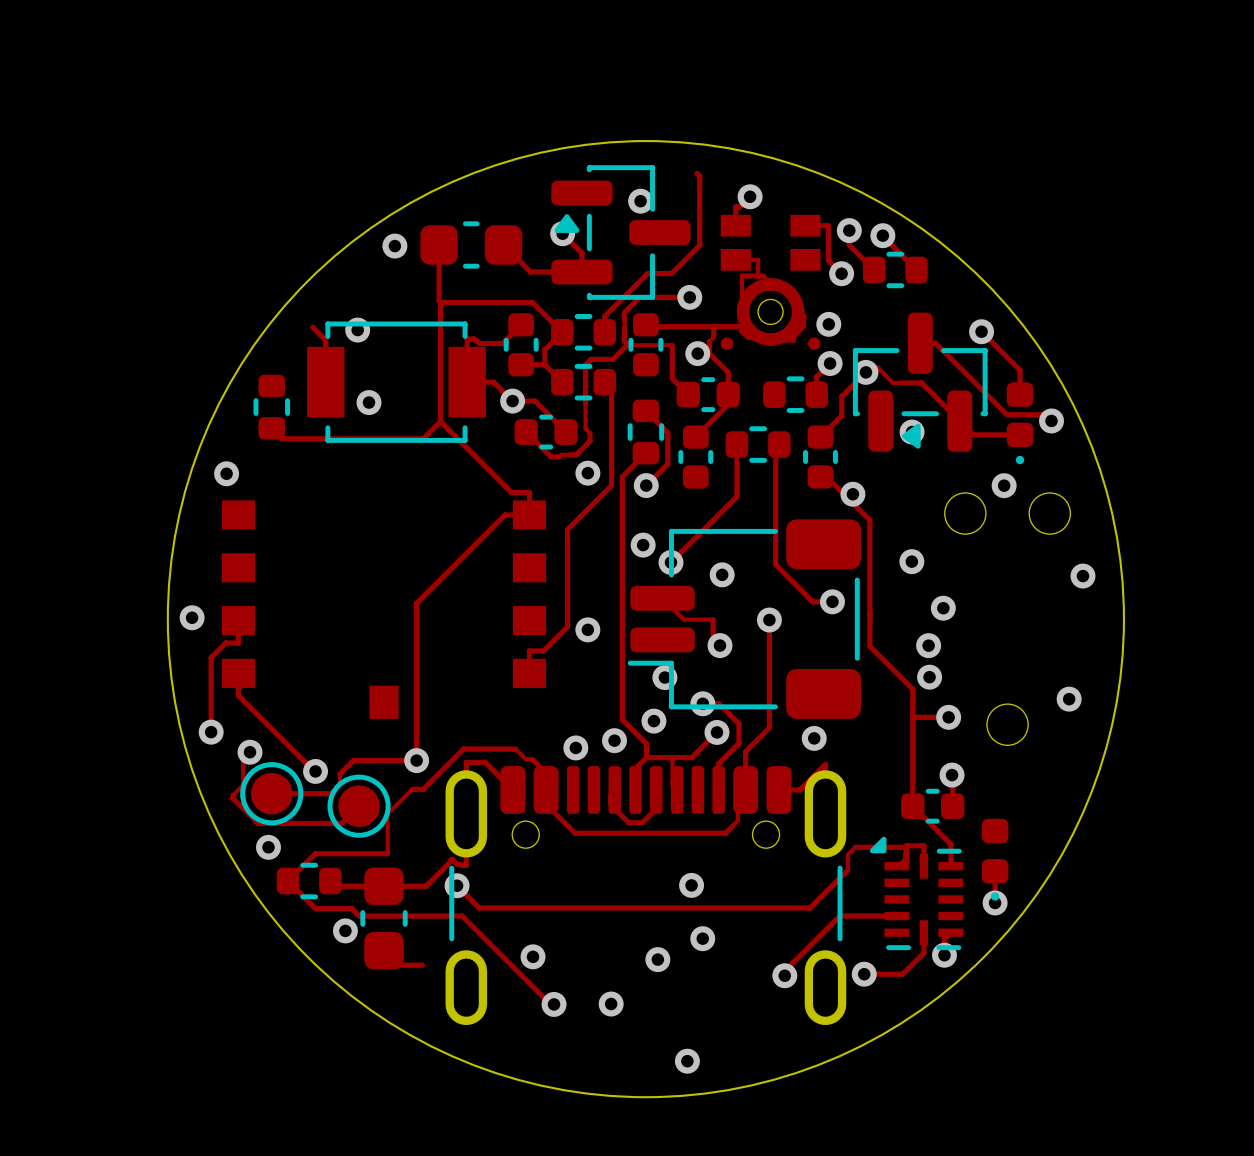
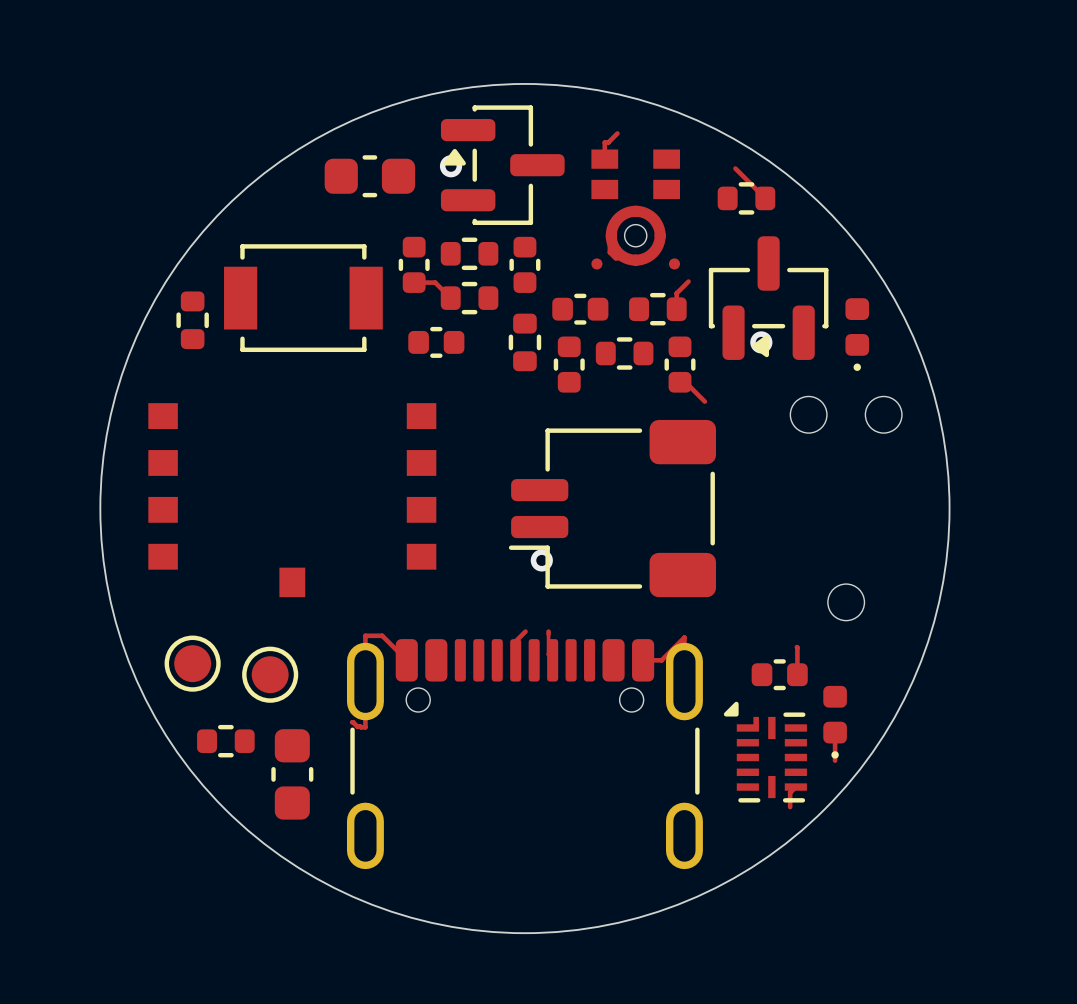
track: (697, 173) (699, 176) (699, 245) (671, 273) (647, 273) (604, 316) (604, 332) -> none
via: (750, 196) -> none
via: (640, 201) -> none
track: (805, 225) (828, 225) (828, 260) (841, 273) -> none
track: (849, 230) (849, 245) (874, 269) -> none
via: (849, 230) -> none
track: (562, 233) (581, 253) (581, 272) (530, 272) (503, 244) -> none
via: (882, 235) -> none
track: (439, 244) (440, 302) -> none
via: (394, 246) -> none
track: (735, 259) (758, 259) (758, 275) -> none
via: (841, 273) -> none
track: (770, 284) (763, 275) (742, 275) (742, 314) -> none
track: (689, 297) (639, 297) (624, 312) (624, 341) (627, 344) -> none
via: (689, 297) -> none
track: (440, 302) (440, 421) -> none
track: (440, 302) (532, 302) (562, 332) (544, 349) (544, 364) -> none
track: (798, 311) (803, 316) (803, 326) (793, 337) (793, 340) (770, 340) -> none
track: (521, 324) (502, 343) (479, 343) (473, 338) (467, 338) (467, 382) (493, 382) (512, 401) (535, 401) (566, 432) -> none
track: (645, 324) (647, 326) (741, 326) -> none
via: (828, 324) -> none
track: (713, 326) (713, 337) (709, 341) (709, 353) -> none
track: (312, 327) (325, 338) (325, 382) -> none
via: (357, 330) -> none
track: (981, 331) (1020, 370) (1020, 394) -> none
via: (981, 331) -> none
track: (920, 343) (935, 343) (1006, 414) (1045, 414) (1051, 420) -> none
track: (627, 344) (612, 359) (591, 359) (585, 365) (585, 428) (589, 433) (589, 441) (576, 454) (551, 456) (526, 432) -> none
track: (627, 344) (672, 345) (672, 378) (688, 394) -> none
via: (697, 353) -> none
track: (709, 353) (728, 372) (728, 404) (695, 437) -> none
via: (830, 363) -> none
via: (865, 372) -> none
track: (604, 382) (611, 389) (611, 485) (567, 529) (567, 626) (543, 650) (529, 650) (529, 673) -> none
via: (512, 401) -> none
via: (368, 402) -> none
track: (645, 410) (667, 432) (667, 464) (646, 485) -> none
via: (1051, 420) -> none
track: (440, 421) (511, 492) (529, 492) (529, 514) (505, 514) (416, 603) (416, 760) (353, 760) (339, 774) (339, 784) (330, 793) (271, 793) -> none
track: (440, 421) (423, 438) (282, 438) (271, 428) -> none
track: (1020, 434) (973, 434) (921, 382) (893, 382) (878, 368) (870, 368) (841, 396) (841, 415) (820, 437) -> none
track: (736, 444) (736, 496) (671, 562) -> none
track: (779, 444) (775, 448) (775, 564) (812, 601) (832, 601) -> none
track: (645, 453) (622, 476) (622, 719) (646, 743) (646, 757) (691, 757) (716, 732) -> none
via: (226, 473) -> none
via: (587, 473) -> none
via: (646, 485) -> none
via: (1004, 485) -> none
track: (852, 494) (848, 498) (869, 520) (869, 646) (912, 689) (912, 806) (950, 844) (950, 866) -> none
via: (852, 494) -> none
via: (643, 545) -> none
via: (911, 561) -> none
via: (671, 562) -> none
via: (722, 574) -> none
via: (1082, 576) -> none
track: (662, 598) (683, 619) (713, 619) (713, 638) (719, 645) -> none
via: (832, 601) -> none
via: (943, 608) -> none
via: (192, 617) -> none
track: (238, 620) (238, 642) (225, 642) (211, 657) (211, 732) -> none
track: (769, 620) (769, 727) (745, 751) (745, 789) (737, 797) (737, 820) (725, 833) (575, 833) (546, 804) (546, 773) (532, 759) (526, 759) (515, 749) (463, 749) (423, 789) (412, 789) (387, 813) (387, 853) (315, 853) (287, 881) (315, 908) (351, 908) (359, 916) (462, 916) (550, 1004) (554, 1004) -> none
via: (769, 620) -> none
via: (587, 629) -> none
via: (719, 645) -> none
via: (928, 645) -> none
track: (238, 673) (238, 695) (315, 771) -> none
via: (929, 677) -> none
via: (1069, 699) -> none
track: (702, 703) (718, 703) (738, 723) (738, 743) (718, 763) (718, 789) -> none
via: (702, 703) -> none
track: (912, 717) (948, 717) -> none
via: (948, 717) -> none
via: (653, 721) -> none
via: (211, 732) -> none
via: (716, 732) -> none
via: (814, 738) -> none
via: (614, 740) -> none
via: (575, 747) -> none
via: (250, 752) -> none
track: (243, 758) (243, 785) (232, 795) (232, 798) (258, 823) (341, 823) (359, 806) -> none
via: (416, 760) -> none
via: (315, 771) -> none
via: (952, 775) -> none
track: (614, 789) (610, 796) (610, 803) (628, 822) (642, 822) (656, 808) (656, 789) -> none
via: (268, 847) -> none
track: (906, 847) (855, 847) (847, 854) (847, 870) (810, 908) (479, 908) (457, 885) -> none
track: (451, 860) (426, 886) (335, 886) (330, 881) -> none
track: (896, 866) (906, 858) (906, 845) (923, 845) (923, 866) -> none
via: (457, 885) -> none
via: (691, 885) -> none
via: (995, 902) -> none
track: (896, 916) (839, 916) (784, 971) (784, 975) -> none
via: (345, 930) -> none
track: (923, 932) (923, 953) (902, 974) (864, 974) -> none
via: (702, 938) -> none
track: (384, 950) (398, 965) (422, 965) -> none
via: (944, 955) -> none
via: (533, 956) -> none
via: (657, 959) -> none
via: (864, 974) -> none
via: (784, 975) -> none
via: (554, 1004) -> none
via: (611, 1004) -> none
via: (687, 1061) -> none

